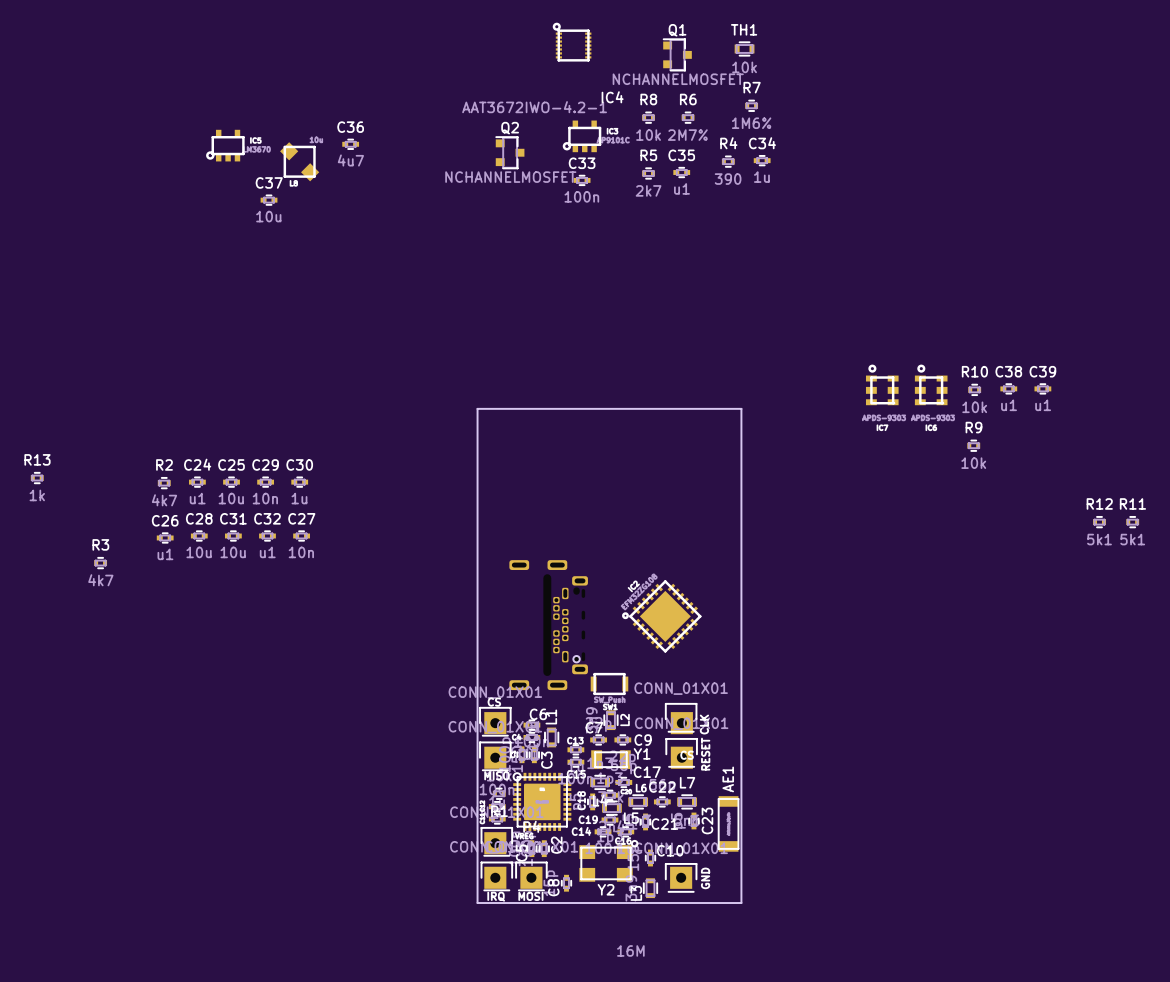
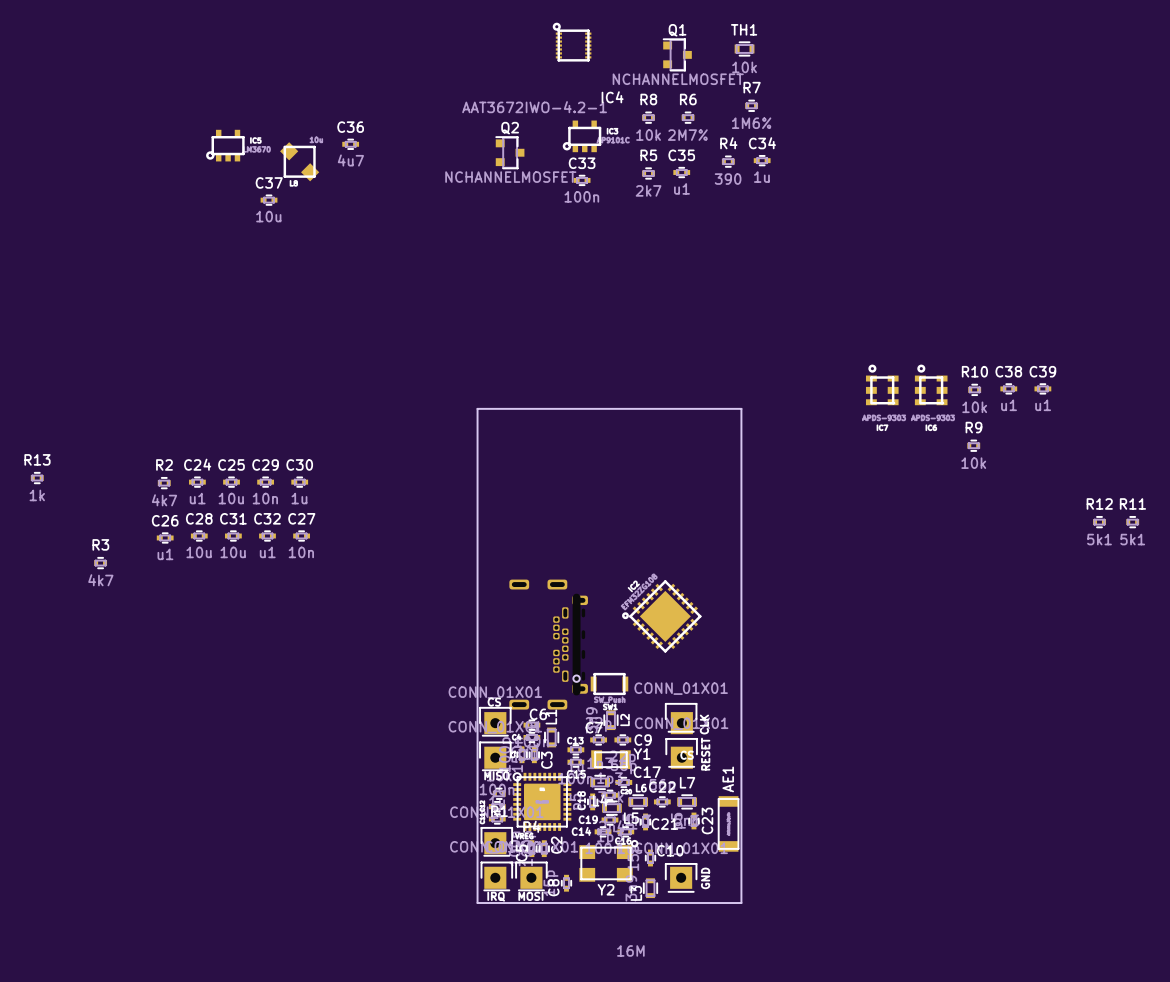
part: (548, 625) -> none
part: none -> (548, 644)

